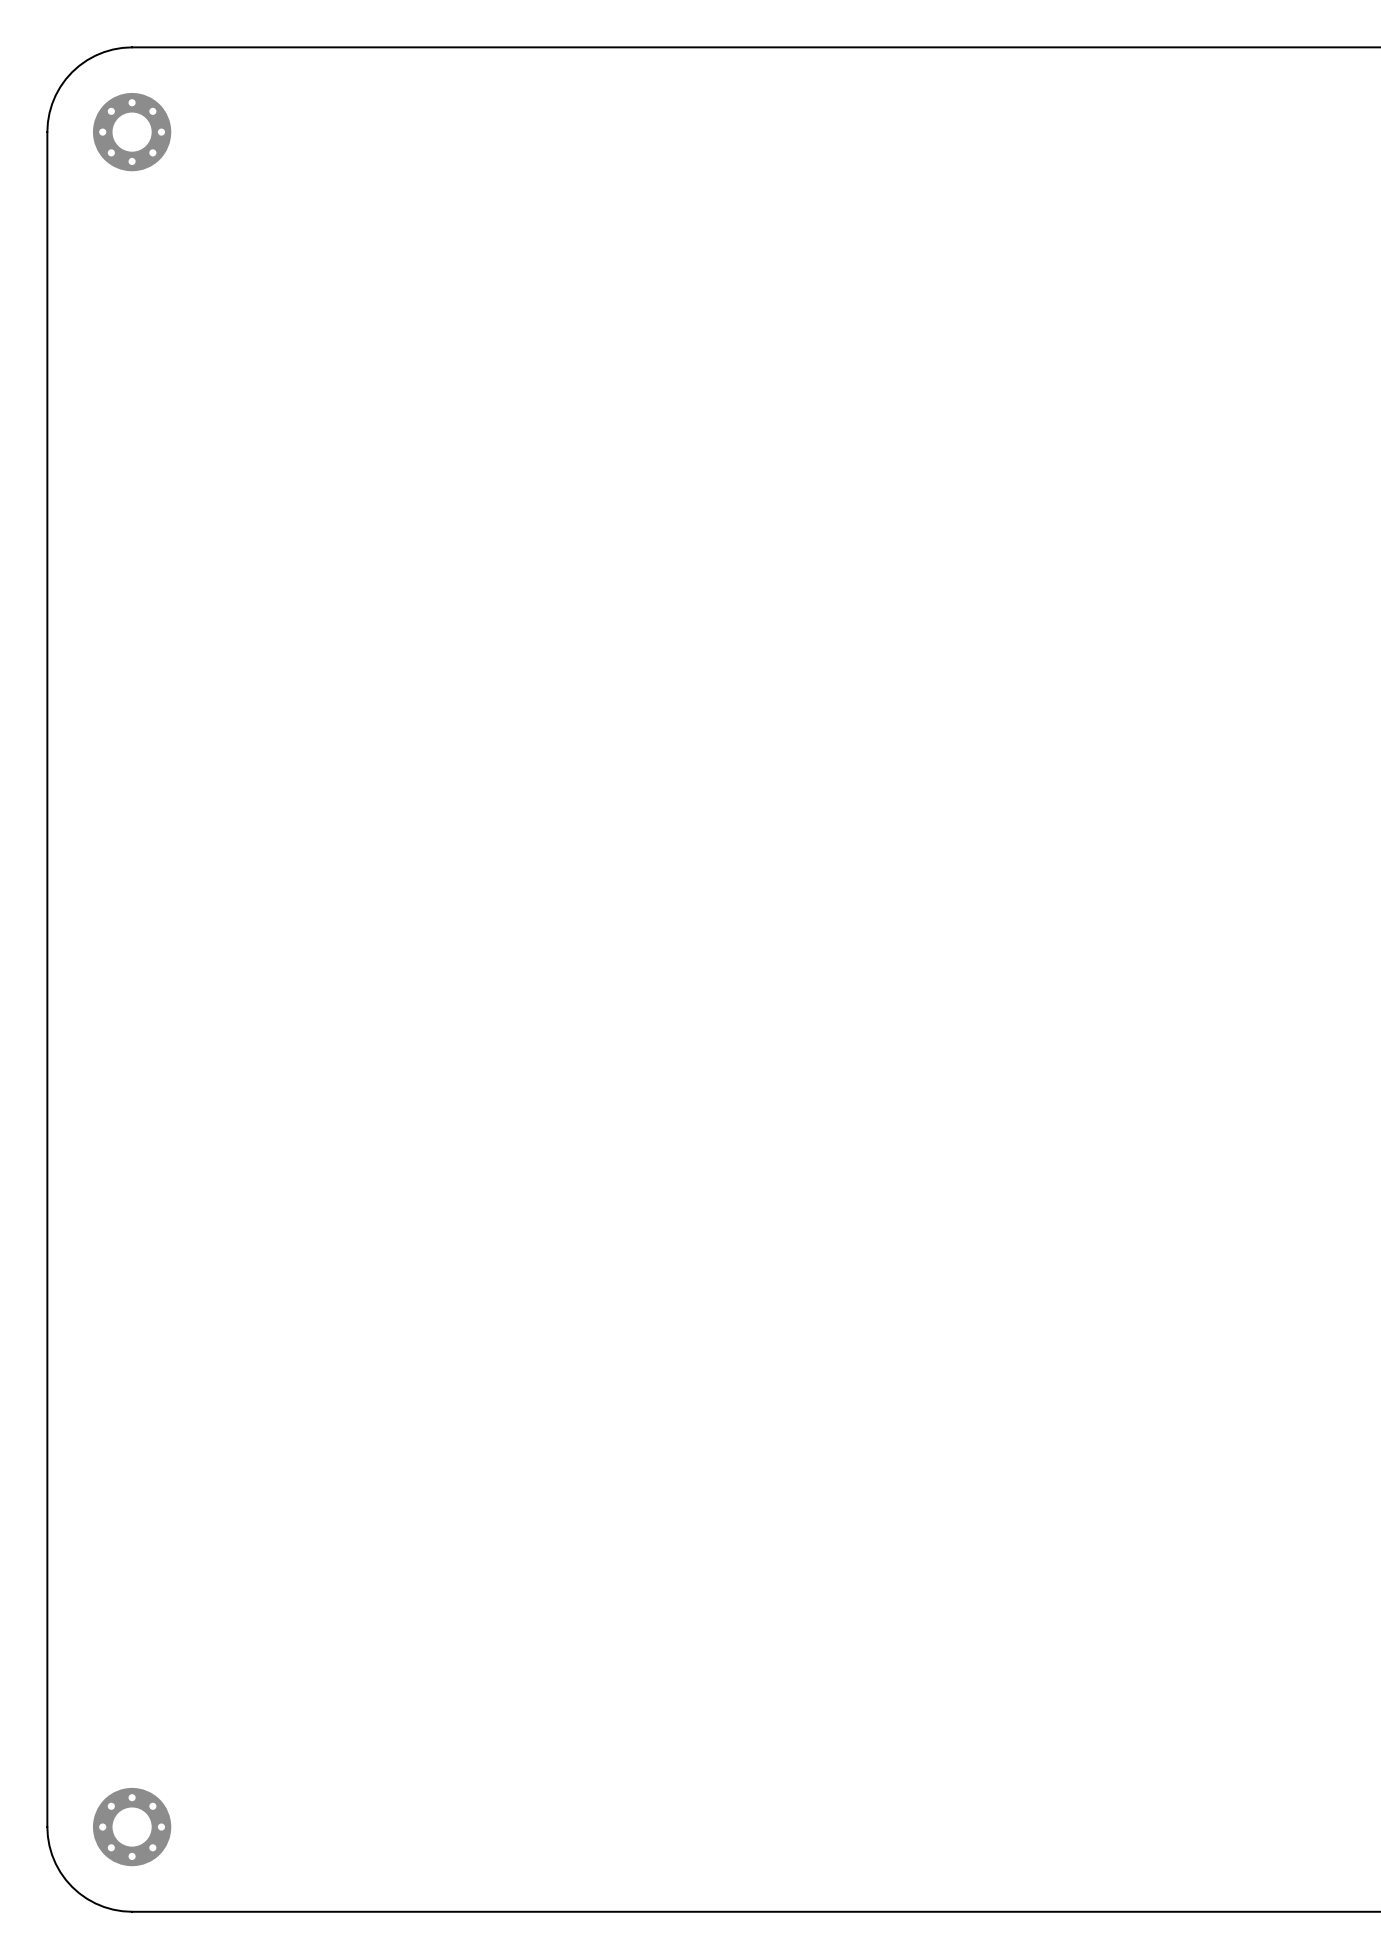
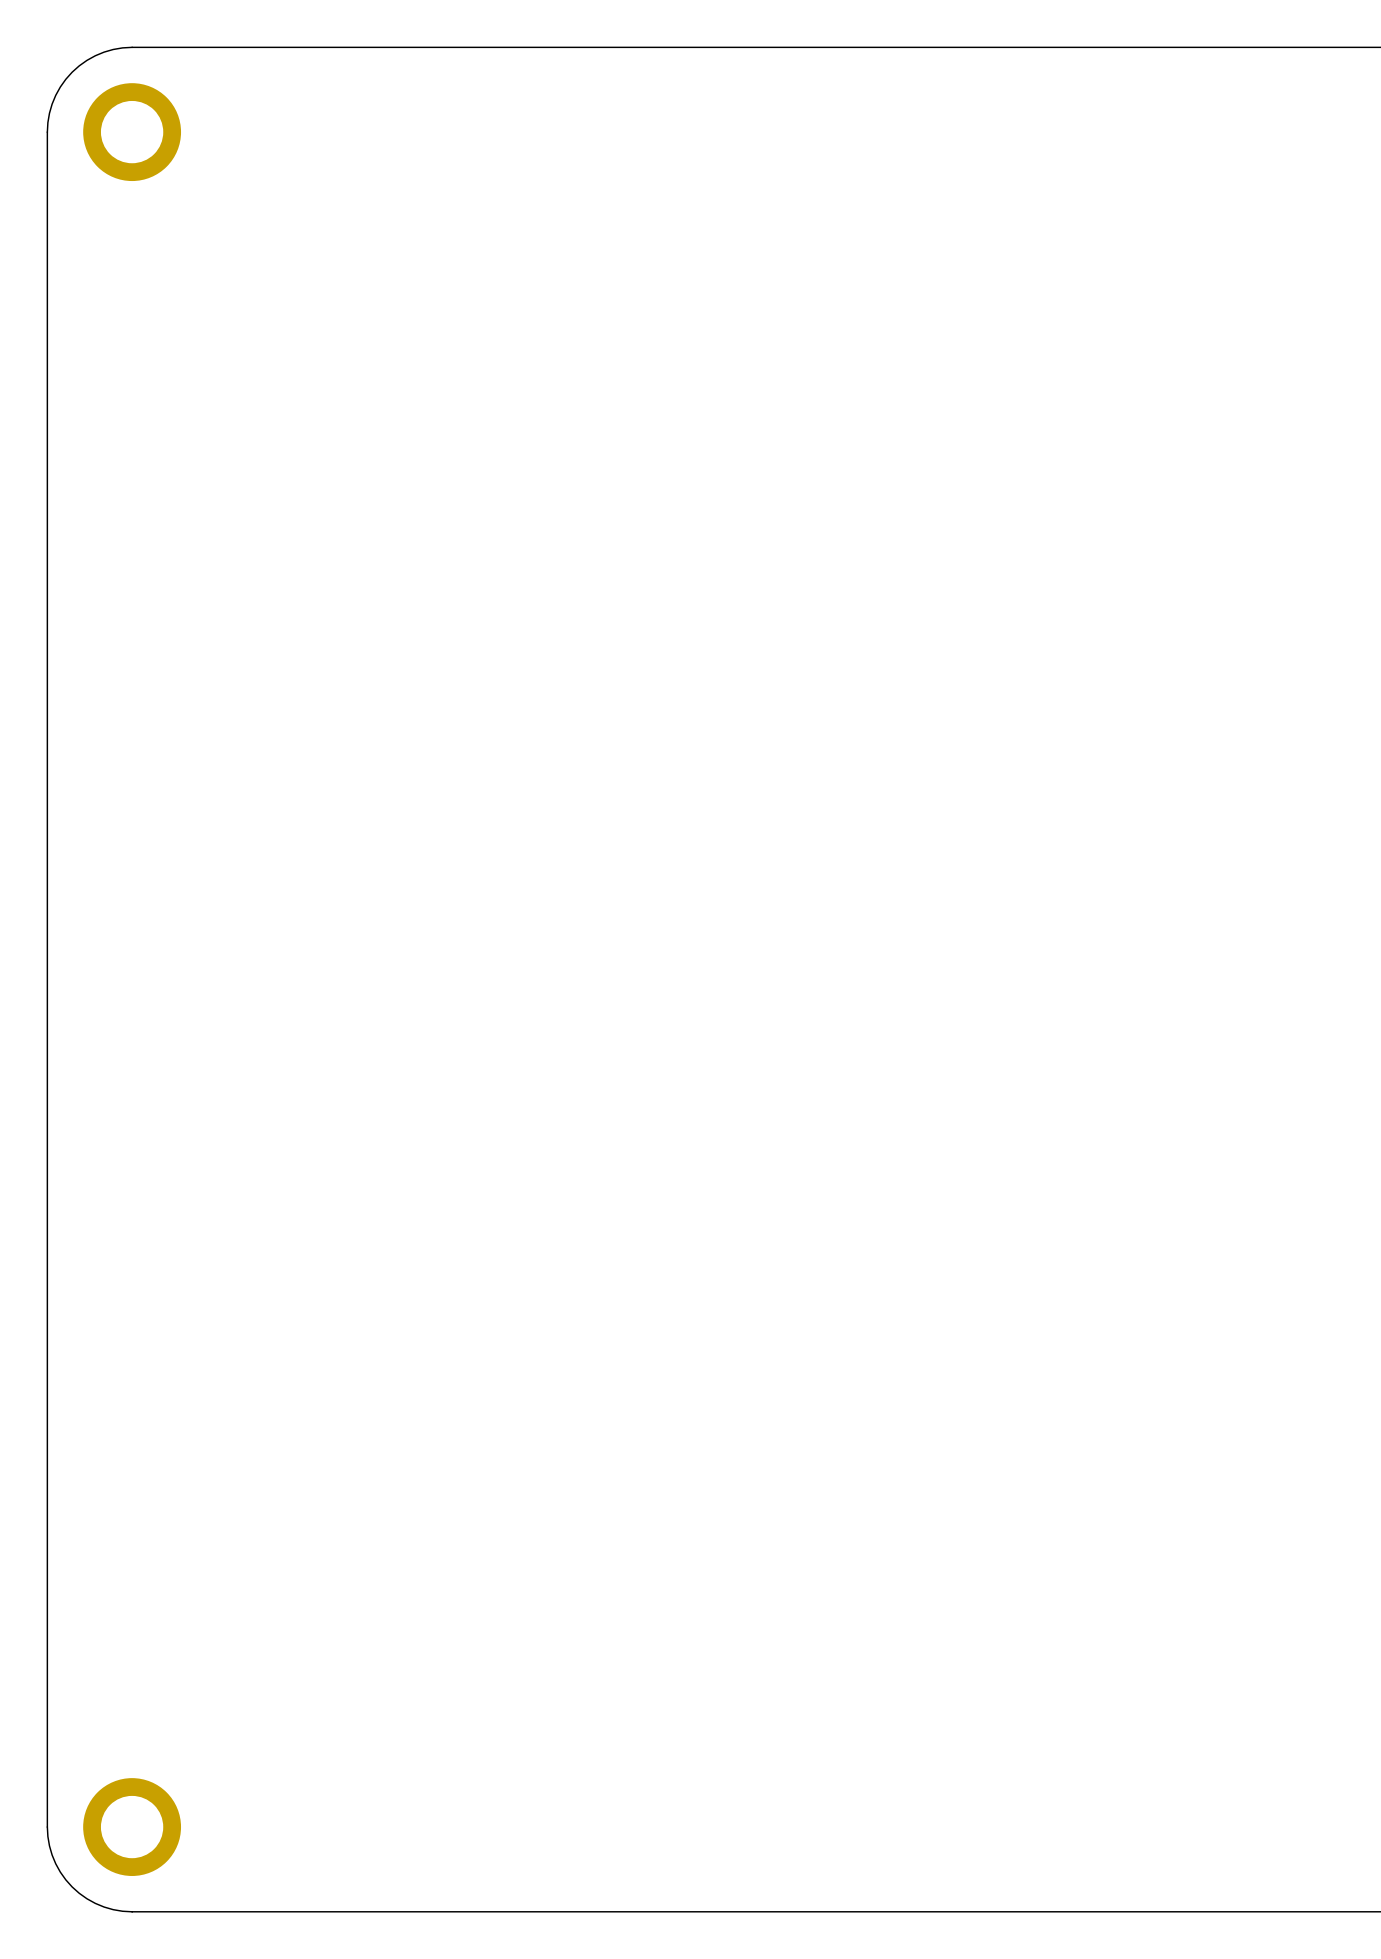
part footprint: [92, 92, 172, 172] -> [83, 83, 182, 182]
part footprint: [92, 1787, 172, 1867] -> [83, 1778, 182, 1876]

